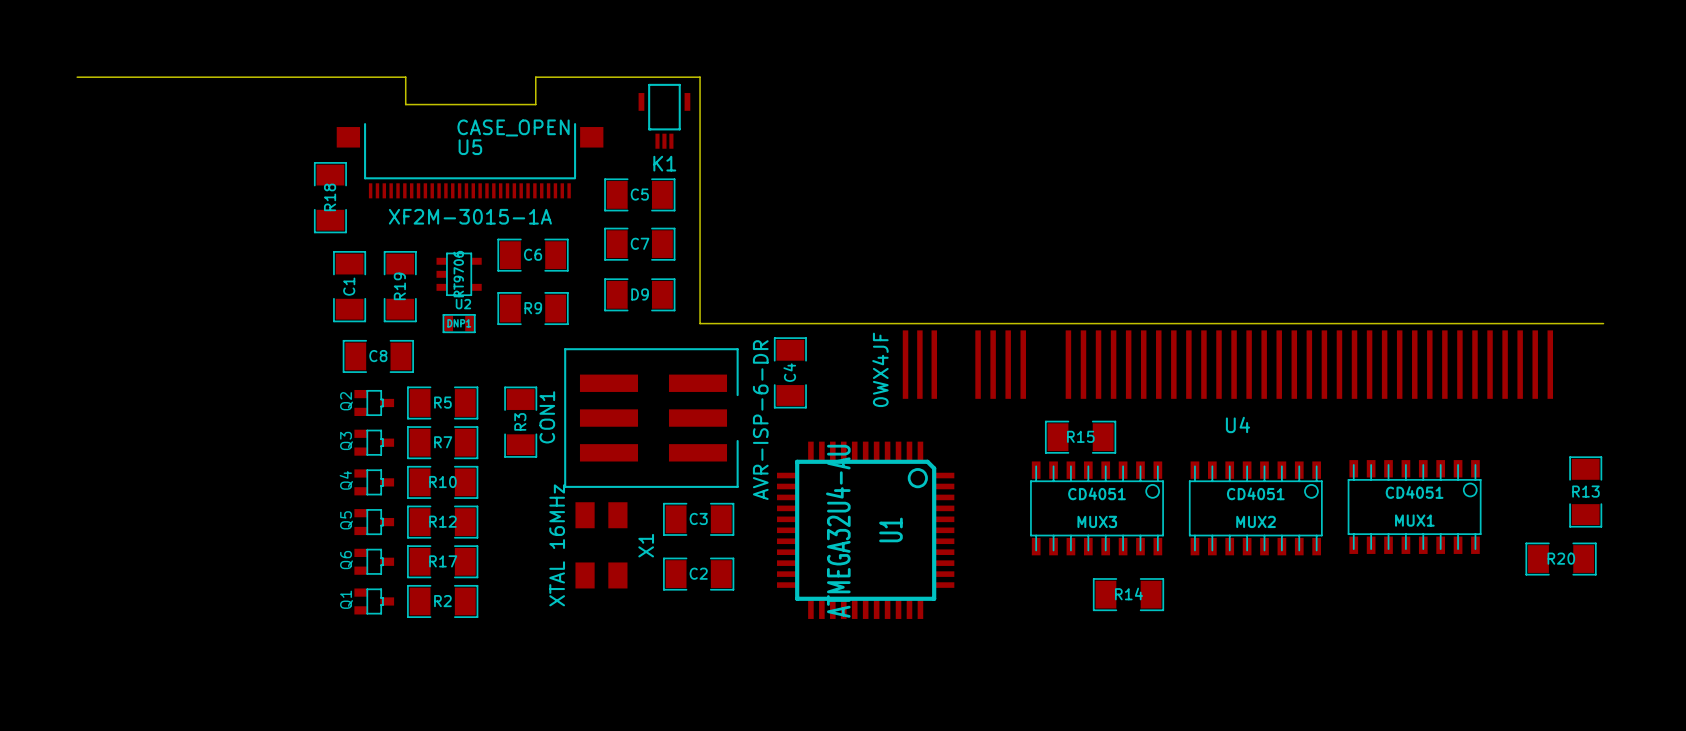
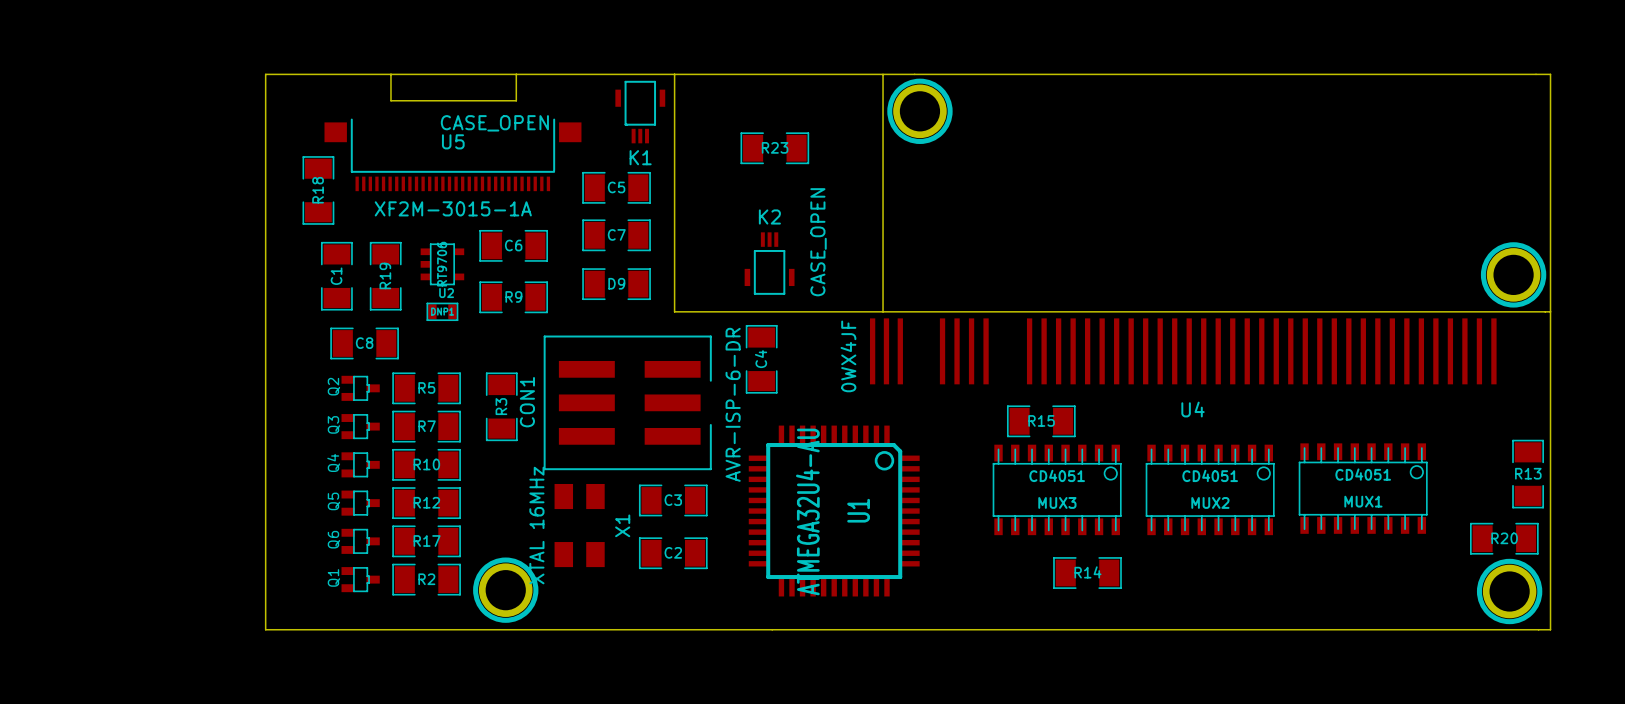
board edge: (77, 77) (275, 77) -> (674, 74) (1550, 74) (1550, 629) (265, 629) (265, 74)
board edge: none -> (390, 74) (516, 74)
board edge: none -> (883, 74) (883, 311)
part: none -> (919, 111)
R23: none -> (774, 148)
K2: none -> CASE_OPEN (769, 263)
part: none -> (1513, 274)
board edge: none -> (1545, 311) (1550, 311)
part: none -> (505, 590)
part: none -> (1509, 591)

